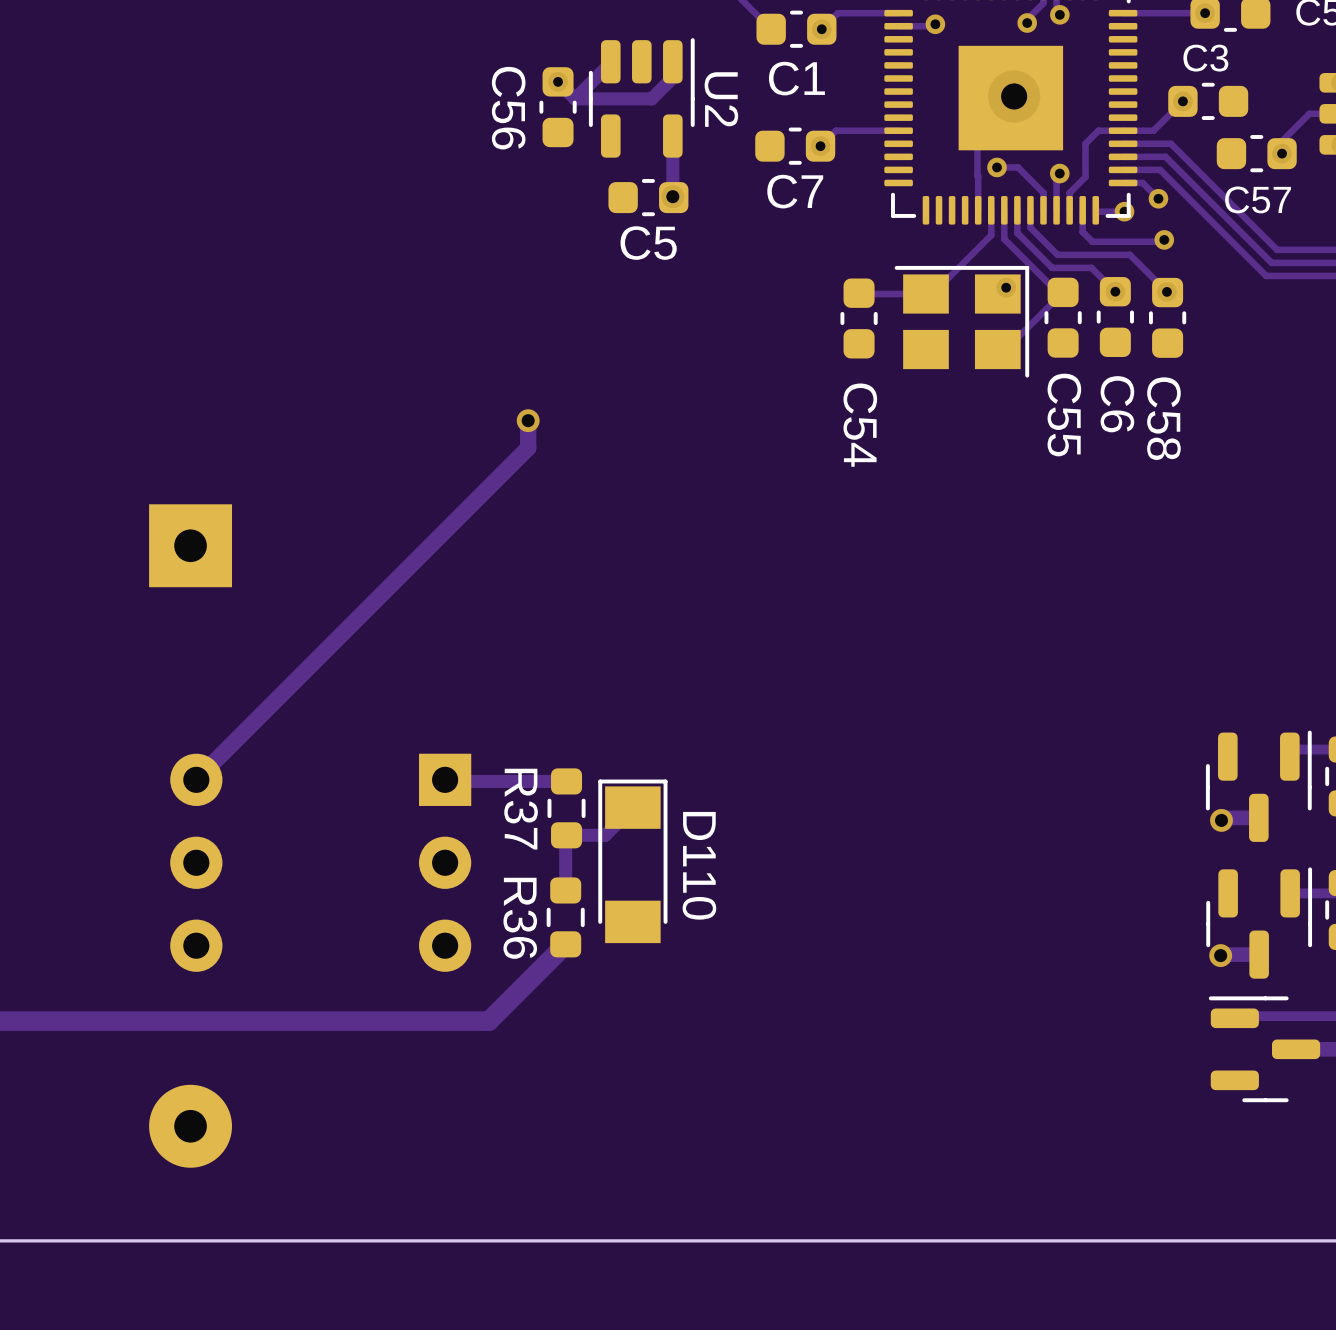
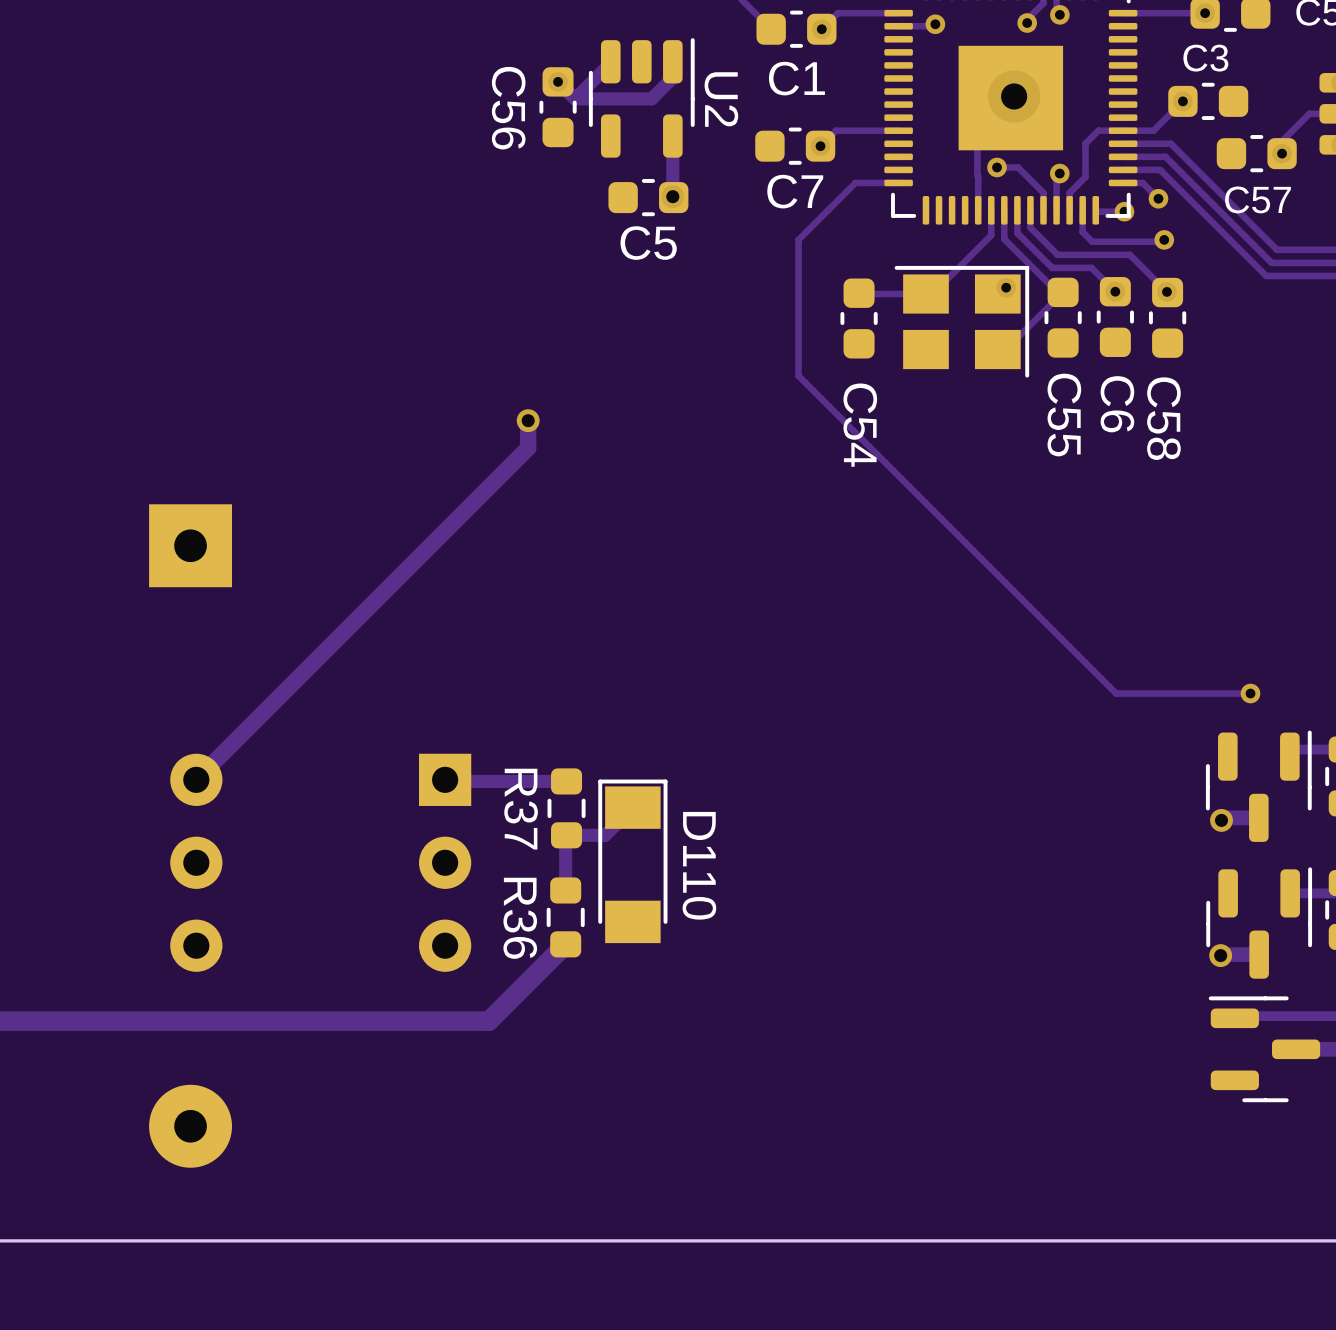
track: none -> (898, 182) (855, 182) (798, 239) (798, 375) (1116, 693) (1250, 693)
via: none -> (1250, 693)

